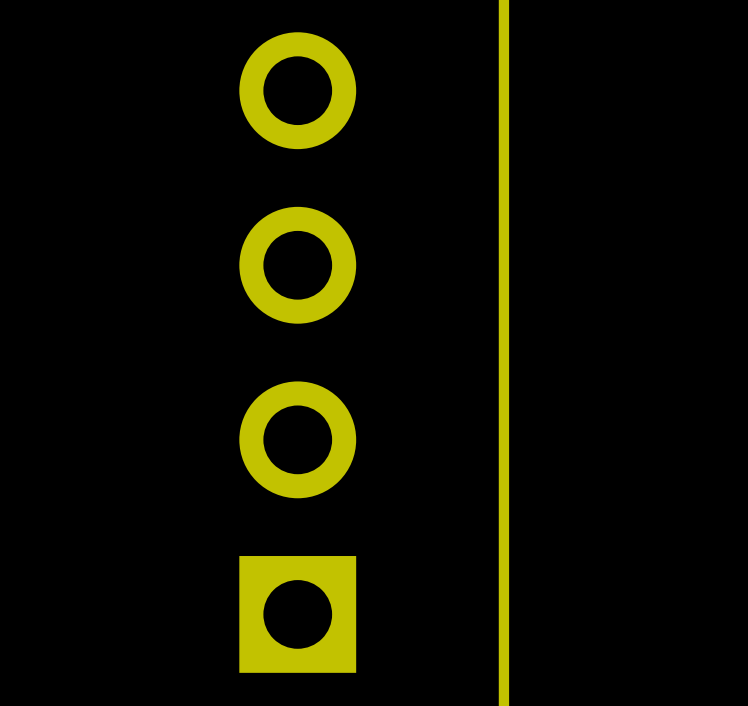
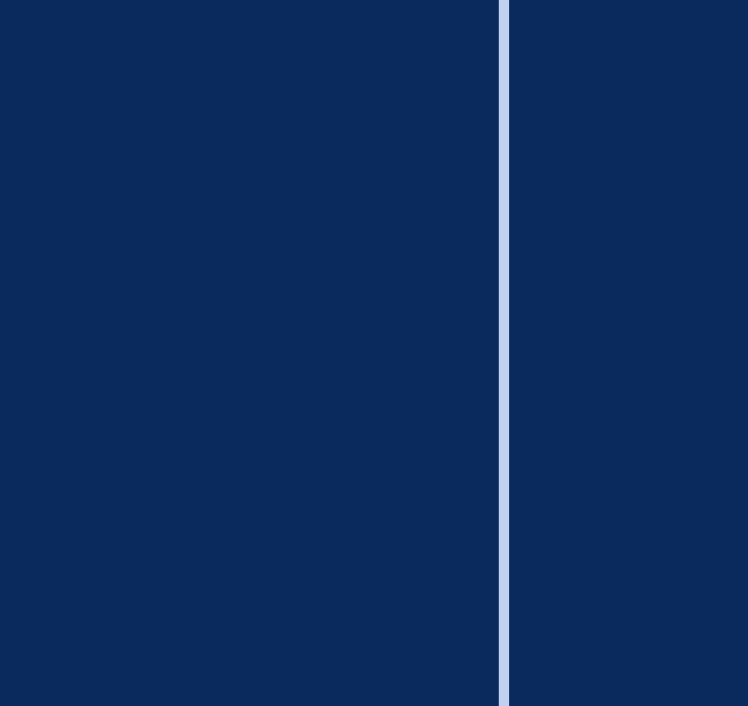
part: (297, 352) -> none

